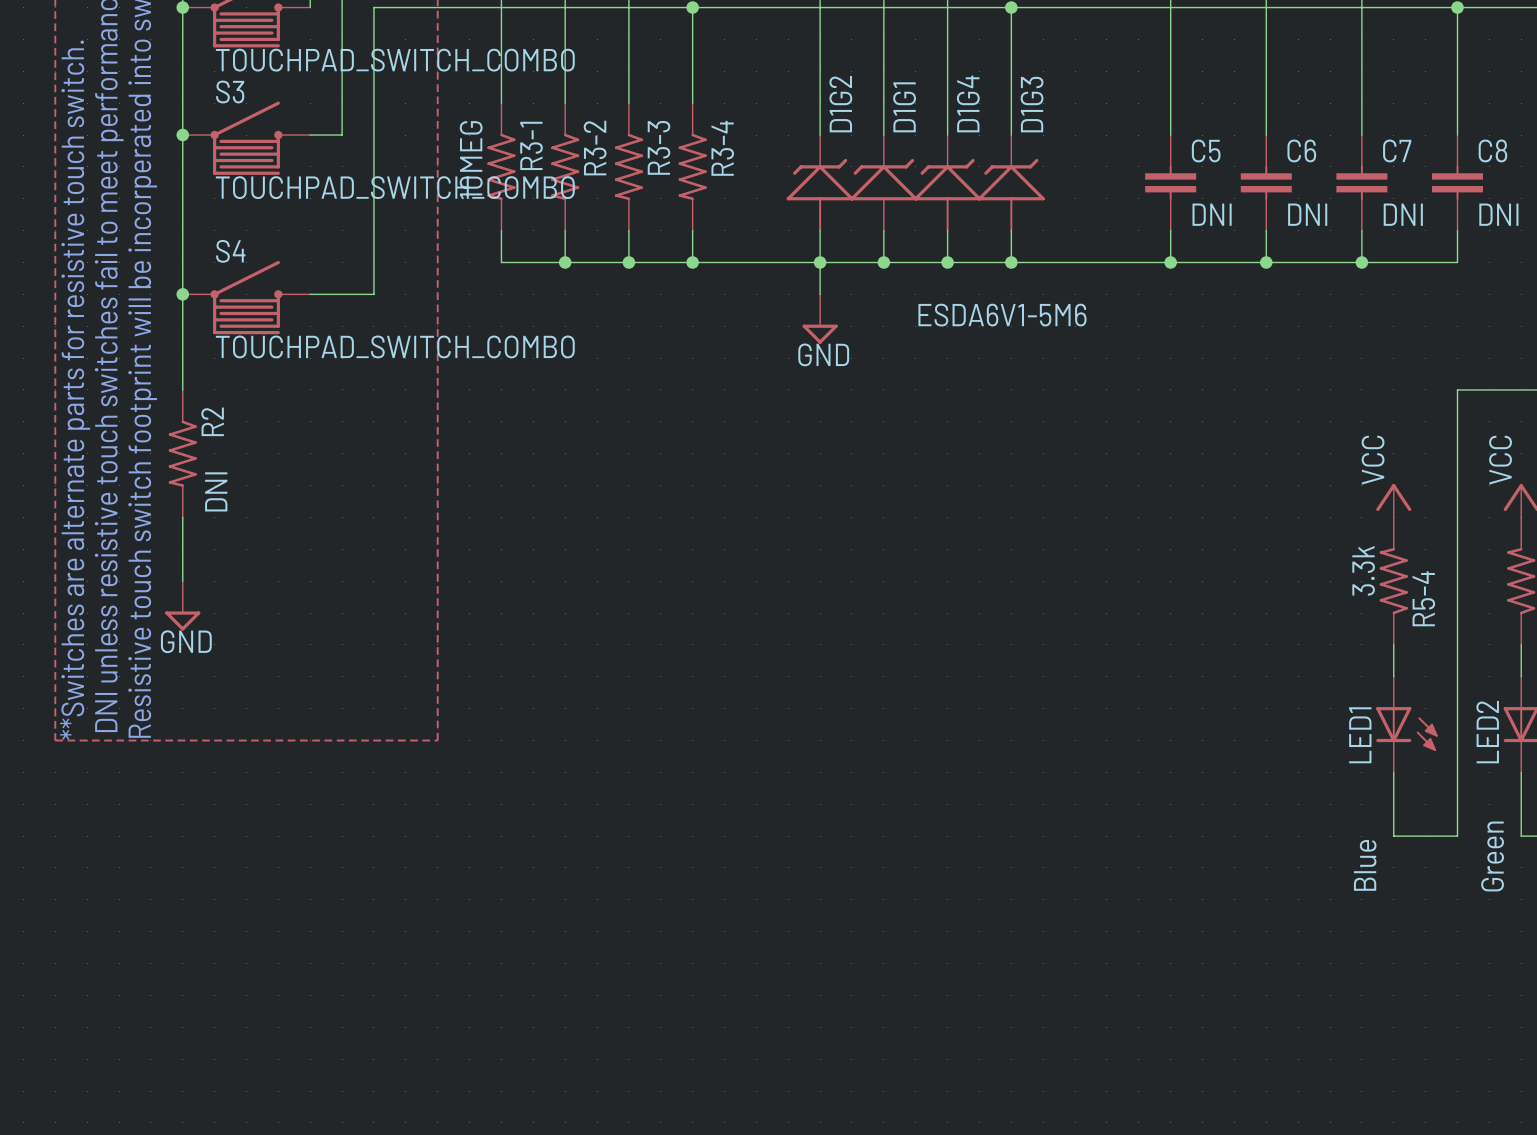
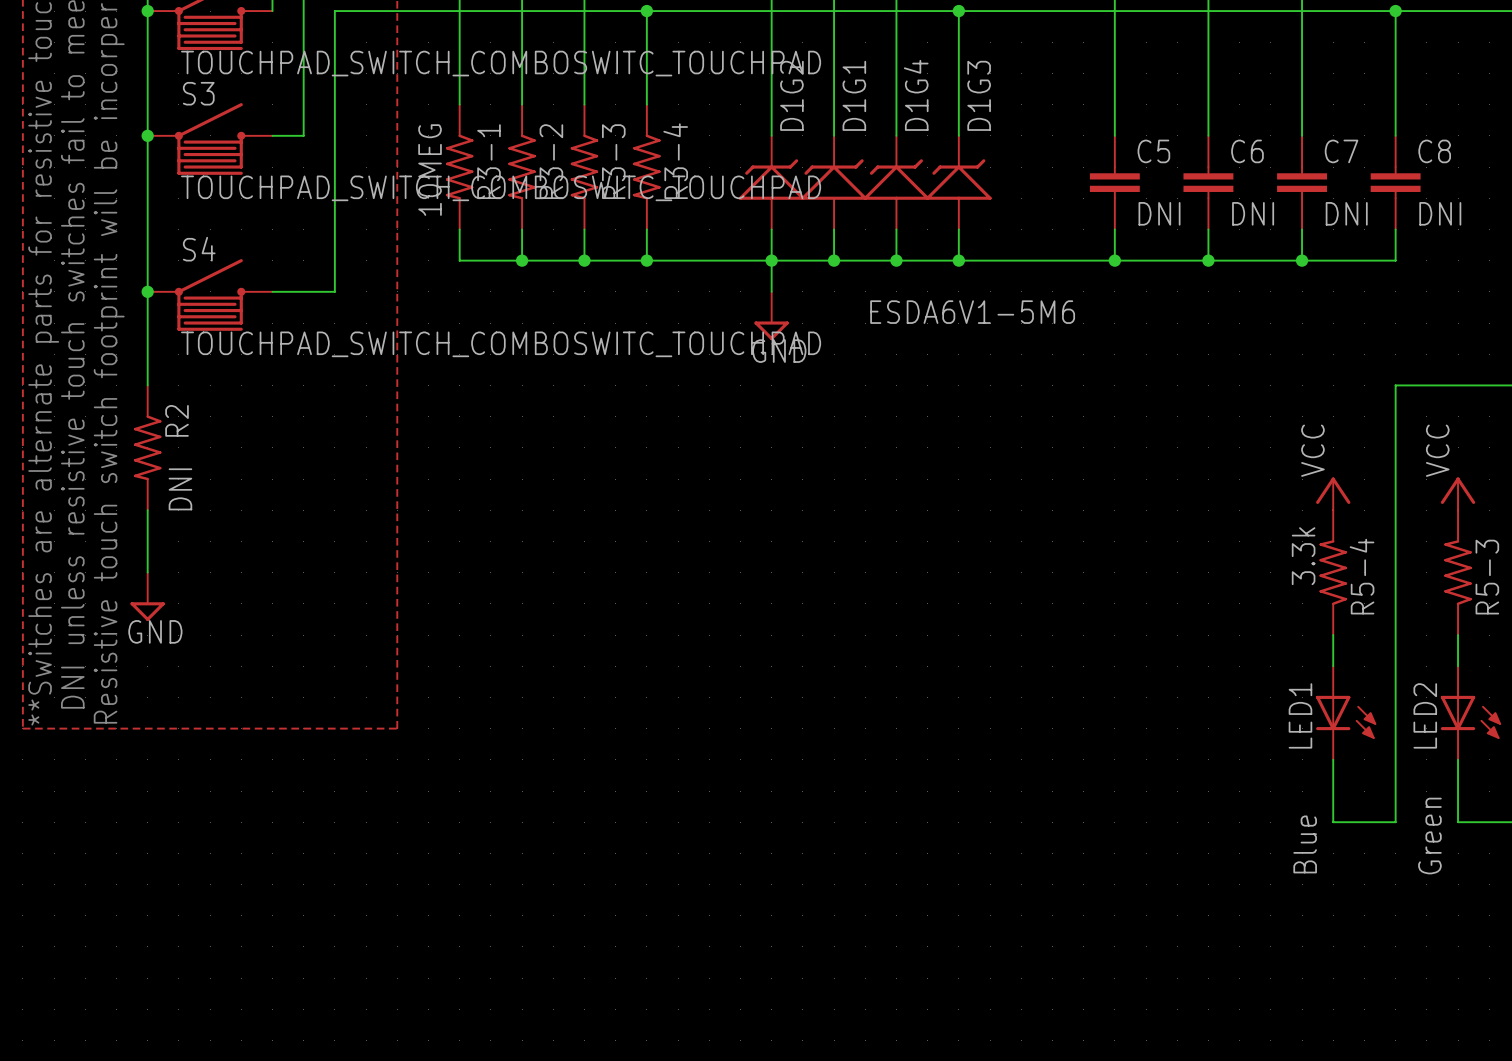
part value: TOUCHPAD_SWITCH_COMBO (395, 60) -> TOUCHPAD_SWITCH_COMBOSWITC_TOUCHPAD (501, 63)
S3 value: TOUCHPAD_SWITCH_COMBO (395, 187) -> TOUCHPAD_SWITCH_COMBOSWITC_TOUCHPAD (501, 188)
S4 value: TOUCHPAD_SWITCH_COMBO (395, 346) -> TOUCHPAD_SWITCH_COMBOSWITC_TOUCHPAD (501, 344)

